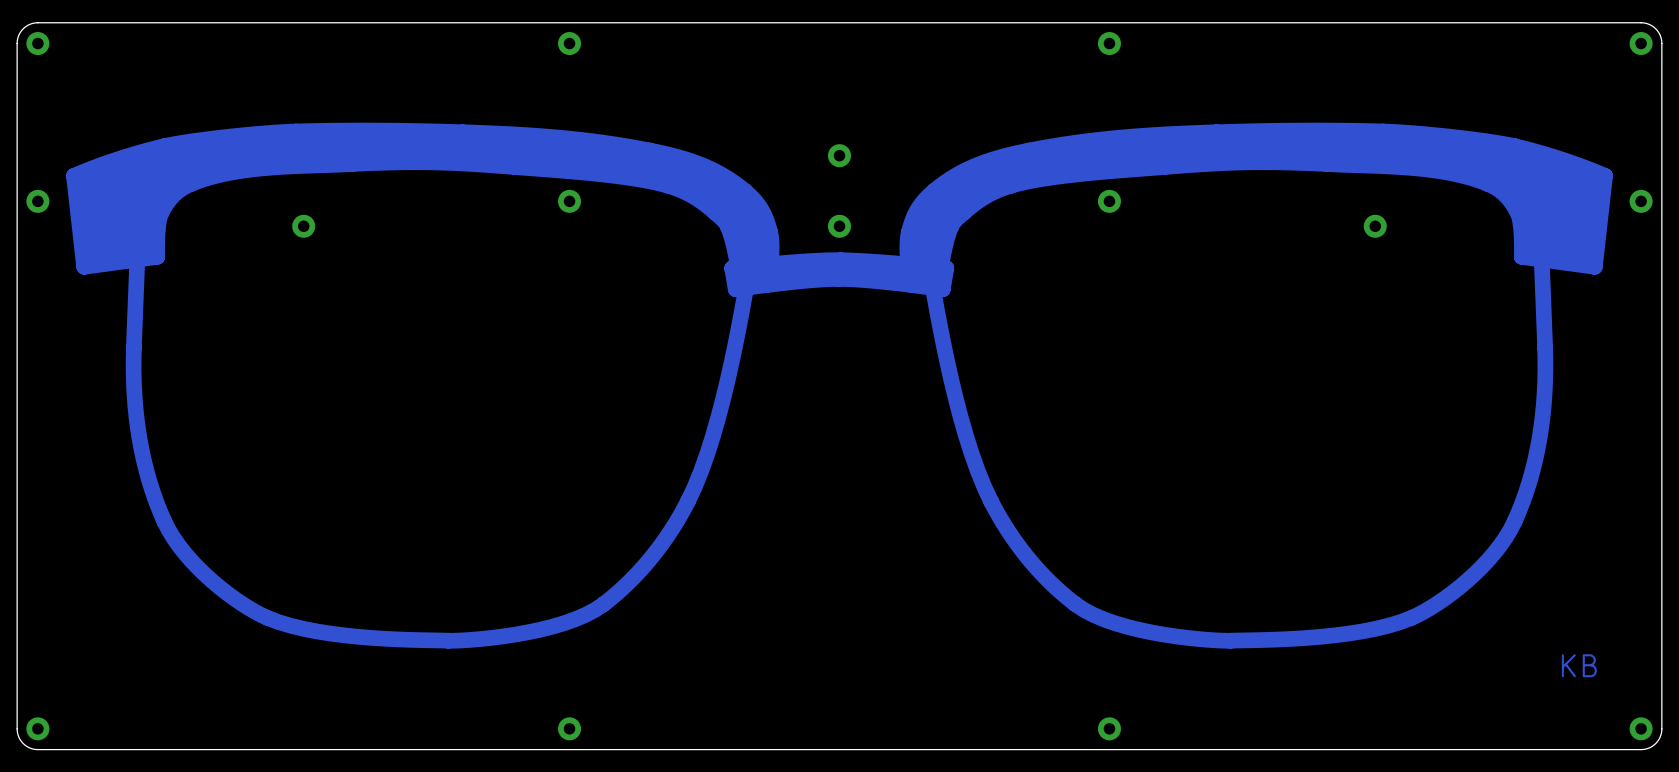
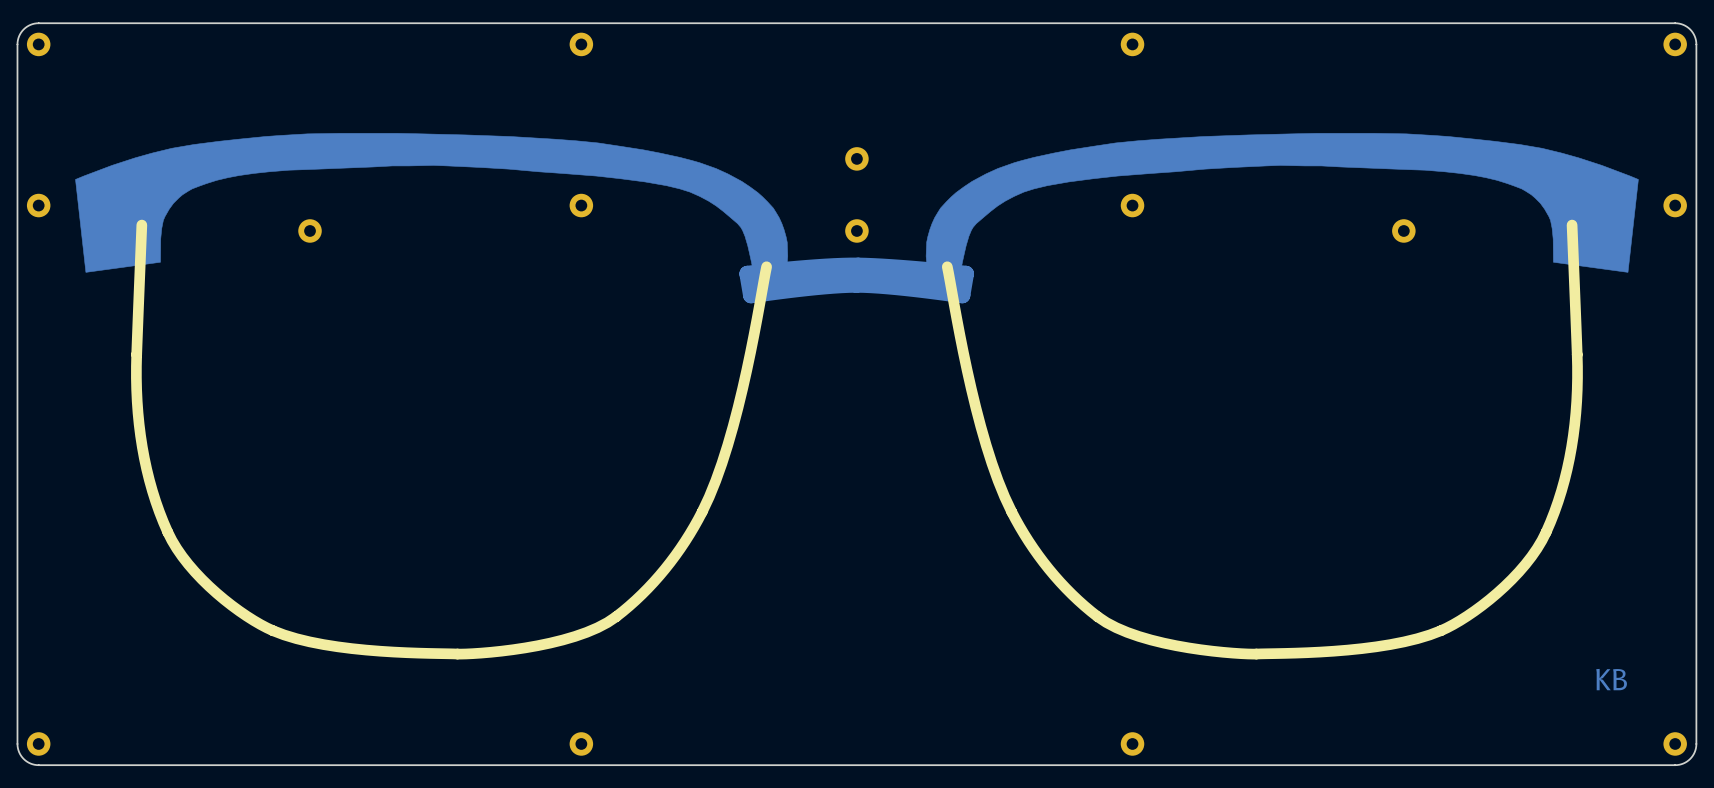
track: (295, 131) (228, 136) (169, 145) (120, 158) (73, 175) (84, 266) (157, 256) (159, 220) (165, 205) (181, 188) (209, 177) (240, 171) (272, 167) (434, 162) (603, 174) (644, 180) (675, 188) (701, 201) (726, 223) (734, 247) (740, 285) (767, 284) (771, 239) (766, 220) (760, 208) (747, 193) (728, 178) (688, 160) (616, 144) (536, 135) (410, 130) (295, 131) -> none
track: (1383, 131) (1450, 136) (1509, 145) (1558, 158) (1605, 175) (1594, 266) (1521, 256) (1520, 220) (1513, 205) (1497, 188) (1469, 177) (1438, 171) (1406, 167) (1244, 162) (1075, 174) (1034, 180) (1003, 188) (977, 201) (952, 223) (944, 247) (938, 285) (911, 284) (907, 239) (912, 220) (918, 208) (931, 193) (950, 178) (990, 160) (1062, 144) (1142, 135) (1268, 130) (1383, 131) -> none
track: (138, 220) (133, 358) (135, 404) (146, 470) (156, 501) (168, 529) (184, 552) (204, 574) (227, 593) (255, 611) (278, 622) (303, 628) (372, 637) (463, 640) (502, 636) (539, 629) (574, 619) (595, 609) (628, 582) (651, 557) (671, 530) (687, 501) (701, 470) (727, 380) (751, 261) -> none
line: none -> (141, 225) (136, 366) (138, 412) (149, 480) (159, 511) (171, 540) (188, 564) (209, 586) (231, 605) (260, 624) (284, 634) (309, 641) (380, 651) (472, 653) (513, 649) (550, 643) (586, 632) (607, 622) (641, 594) (664, 569) (685, 541) (702, 511) (715, 480) (727, 445) (742, 388) (766, 266)
track: (1540, 220) (1545, 358) (1543, 404) (1532, 470) (1522, 501) (1510, 529) (1494, 552) (1474, 574) (1451, 593) (1423, 611) (1400, 622) (1375, 628) (1306, 637) (1215, 640) (1176, 636) (1139, 629) (1104, 619) (1083, 609) (1050, 582) (1027, 557) (1007, 530) (991, 501) (977, 470) (951, 380) (928, 261) -> none
line: none -> (1572, 225) (1577, 366) (1575, 412) (1564, 480) (1554, 511) (1541, 540) (1525, 564) (1504, 586) (1482, 605) (1453, 624) (1429, 634) (1404, 641) (1333, 651) (1241, 653) (1200, 649) (1163, 643) (1127, 632) (1106, 622) (1072, 594) (1048, 569) (1028, 541) (1011, 511) (998, 480) (986, 445) (971, 388) (947, 266)

